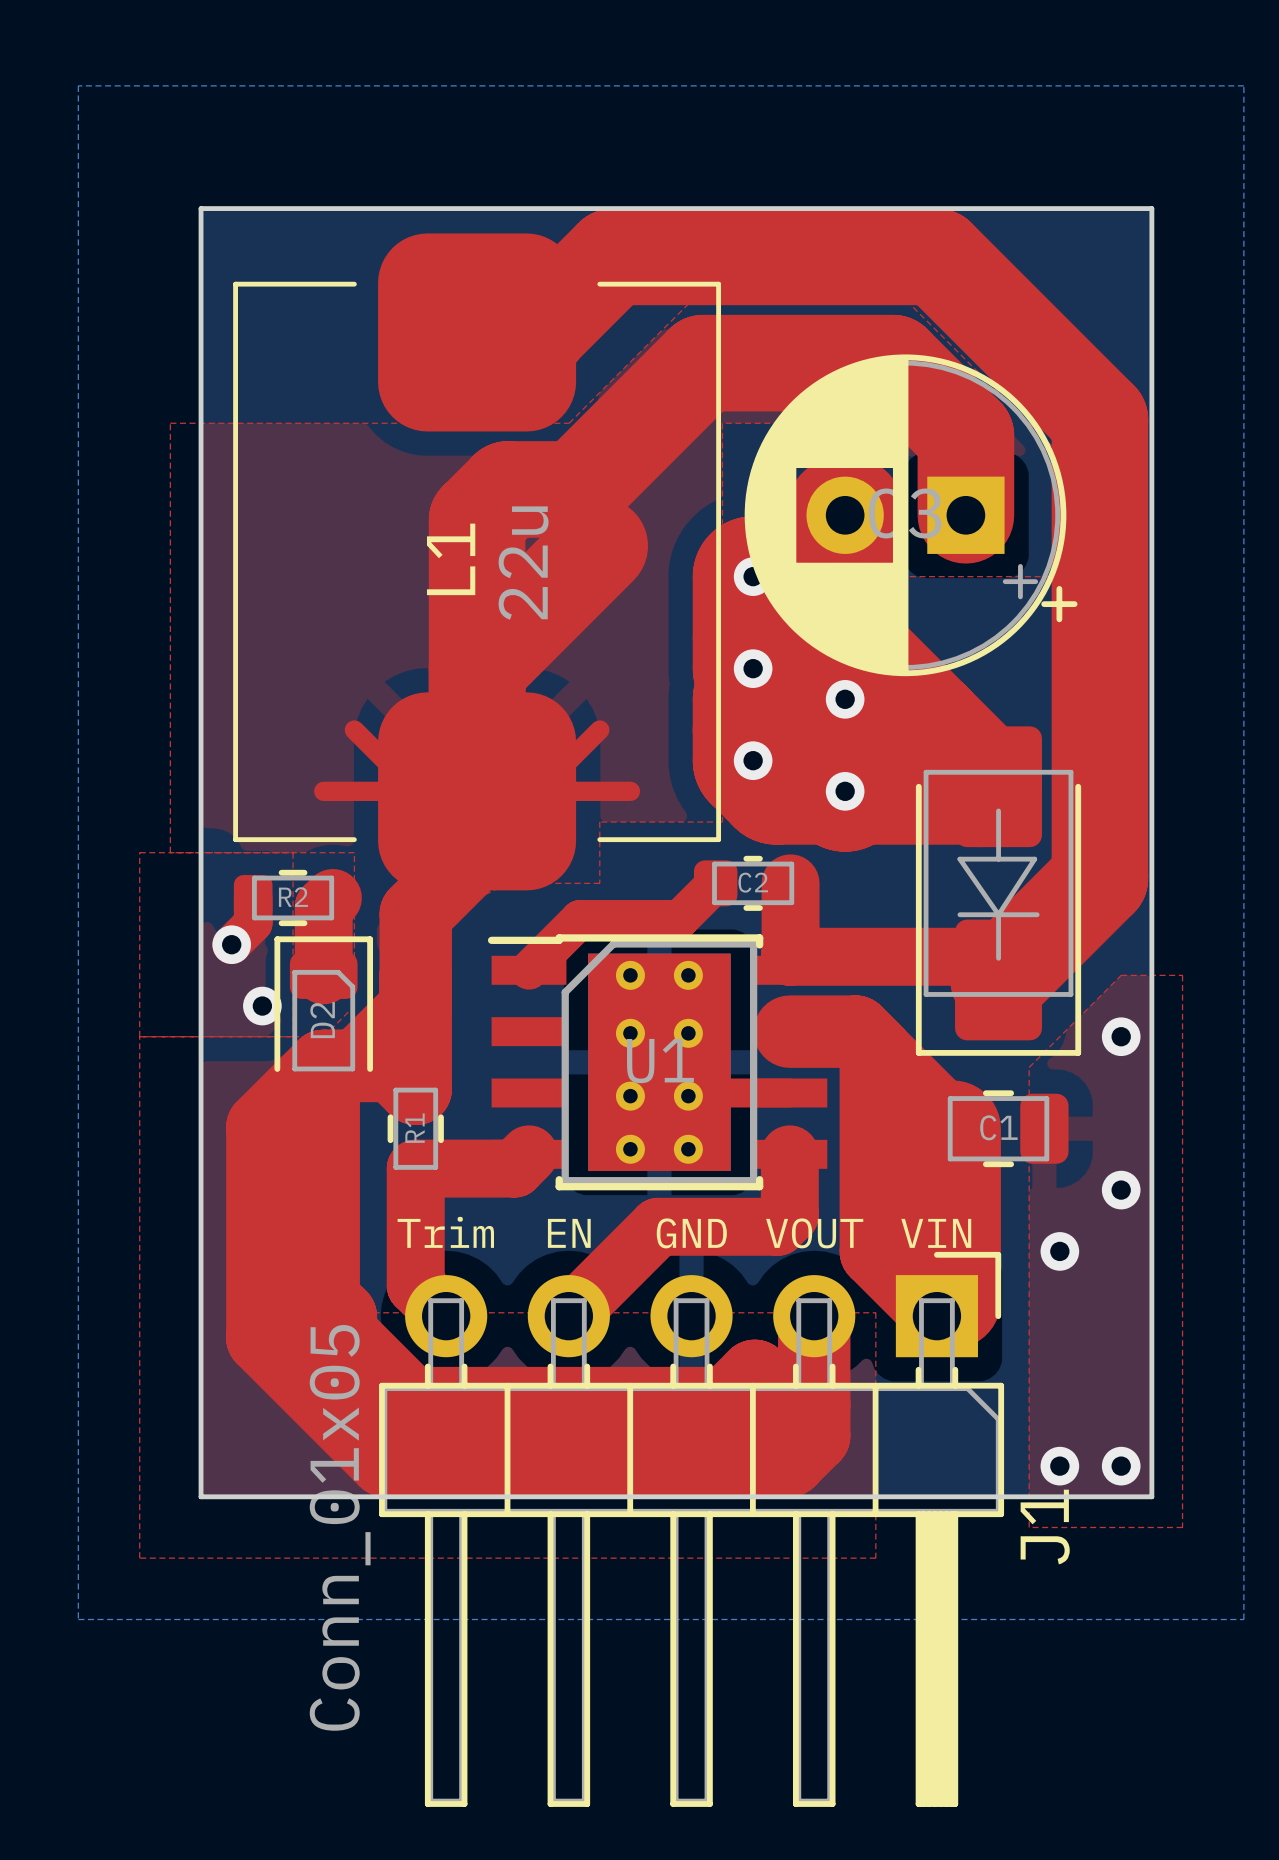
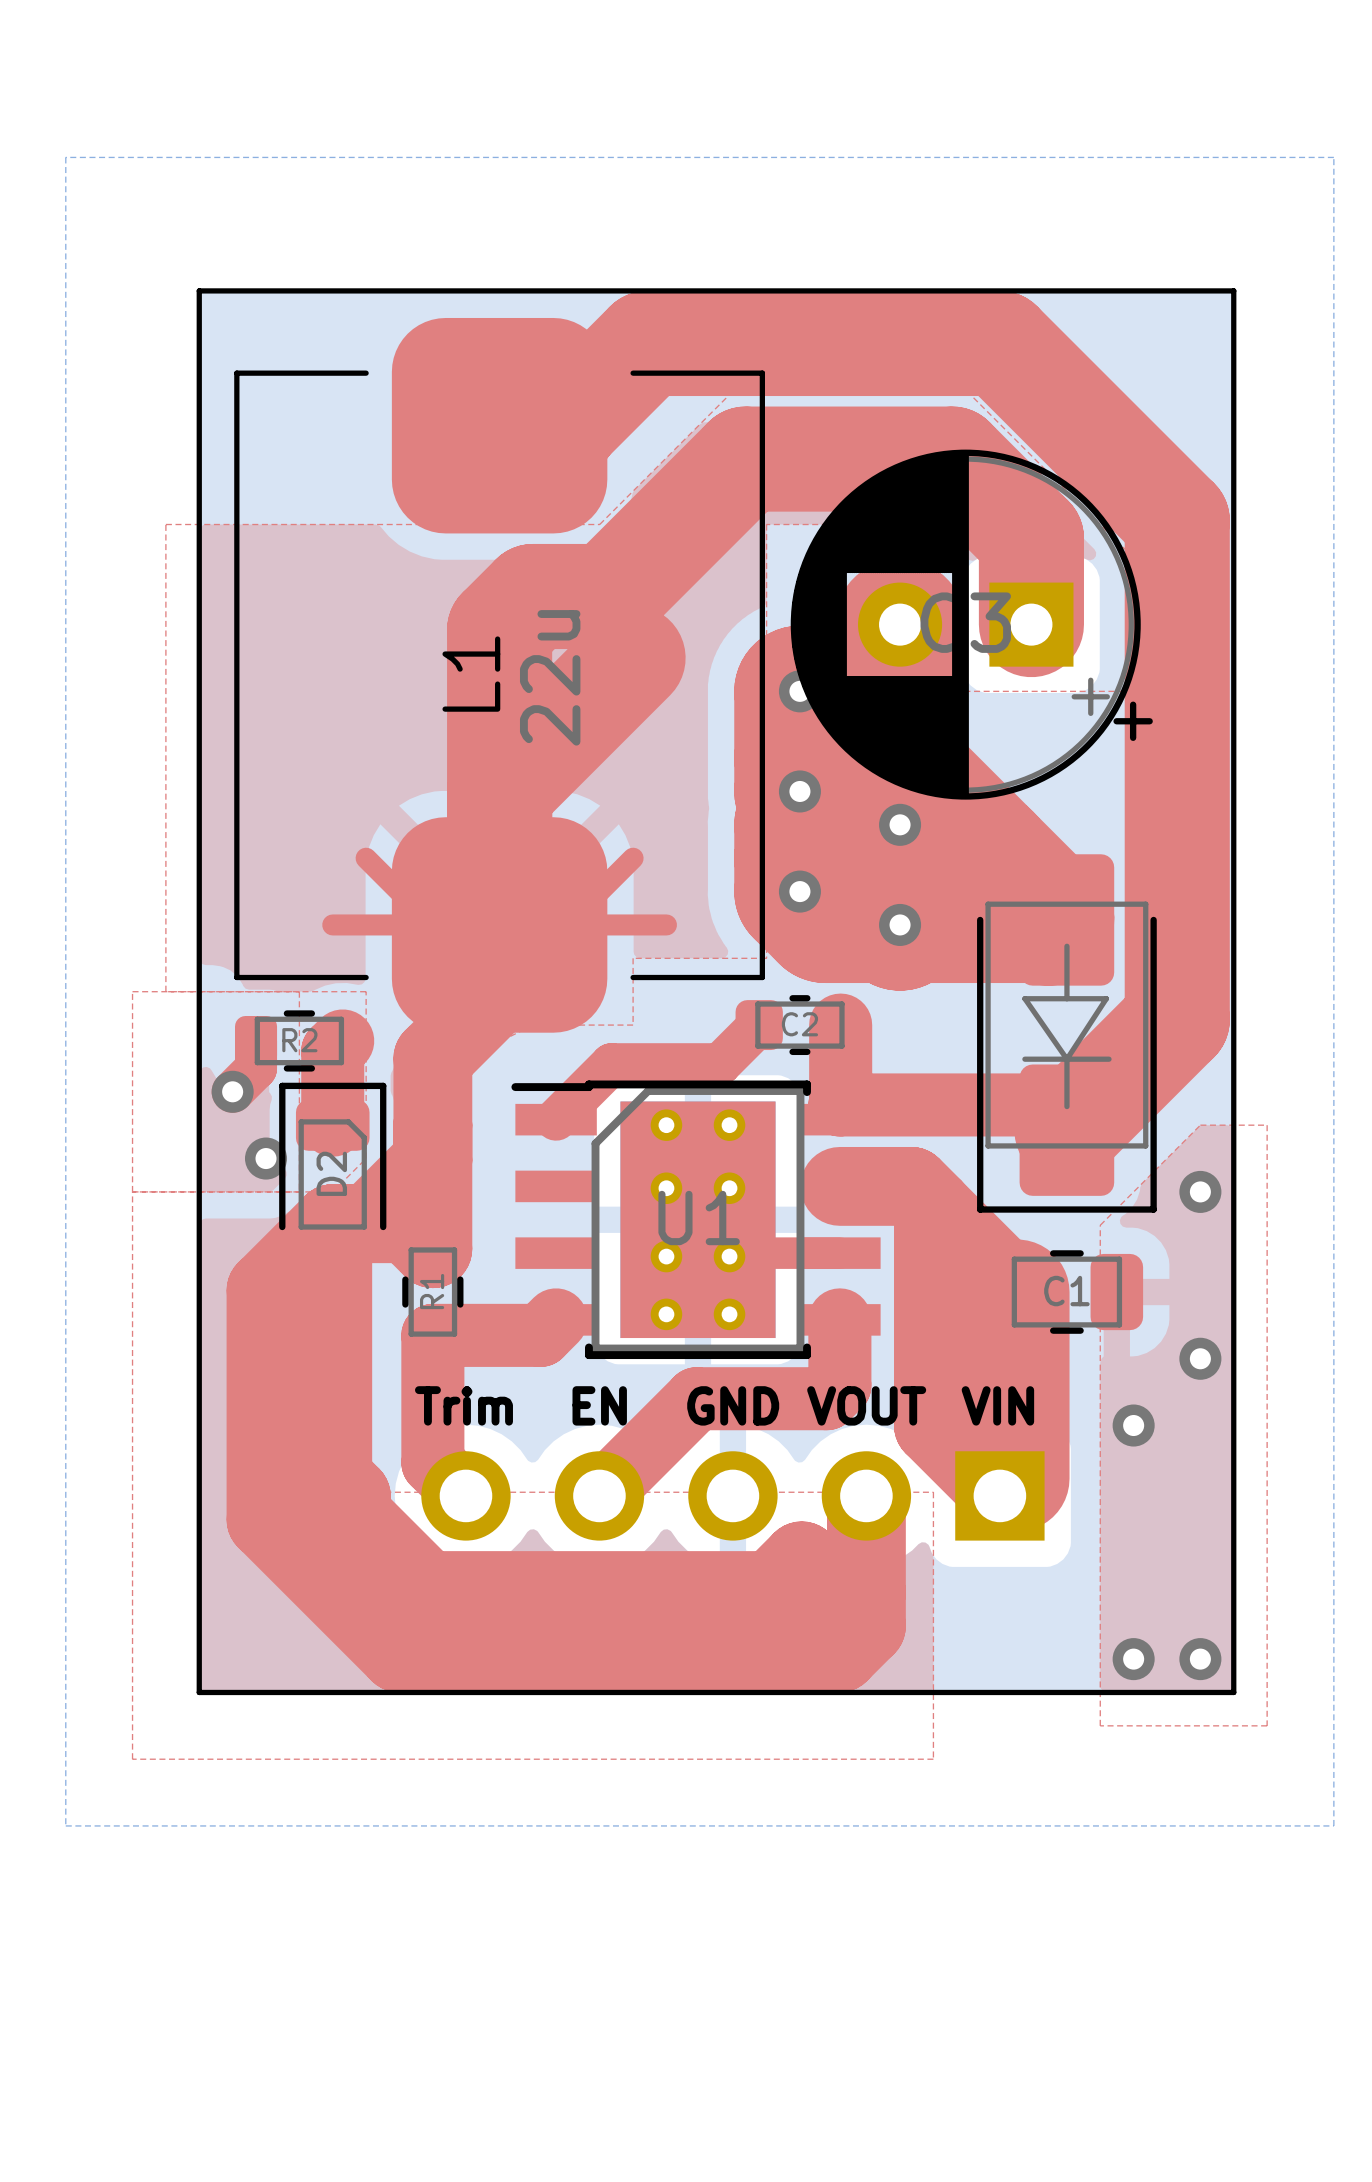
J1 side: top (691, 1529) -> bottom (732, 1495)

